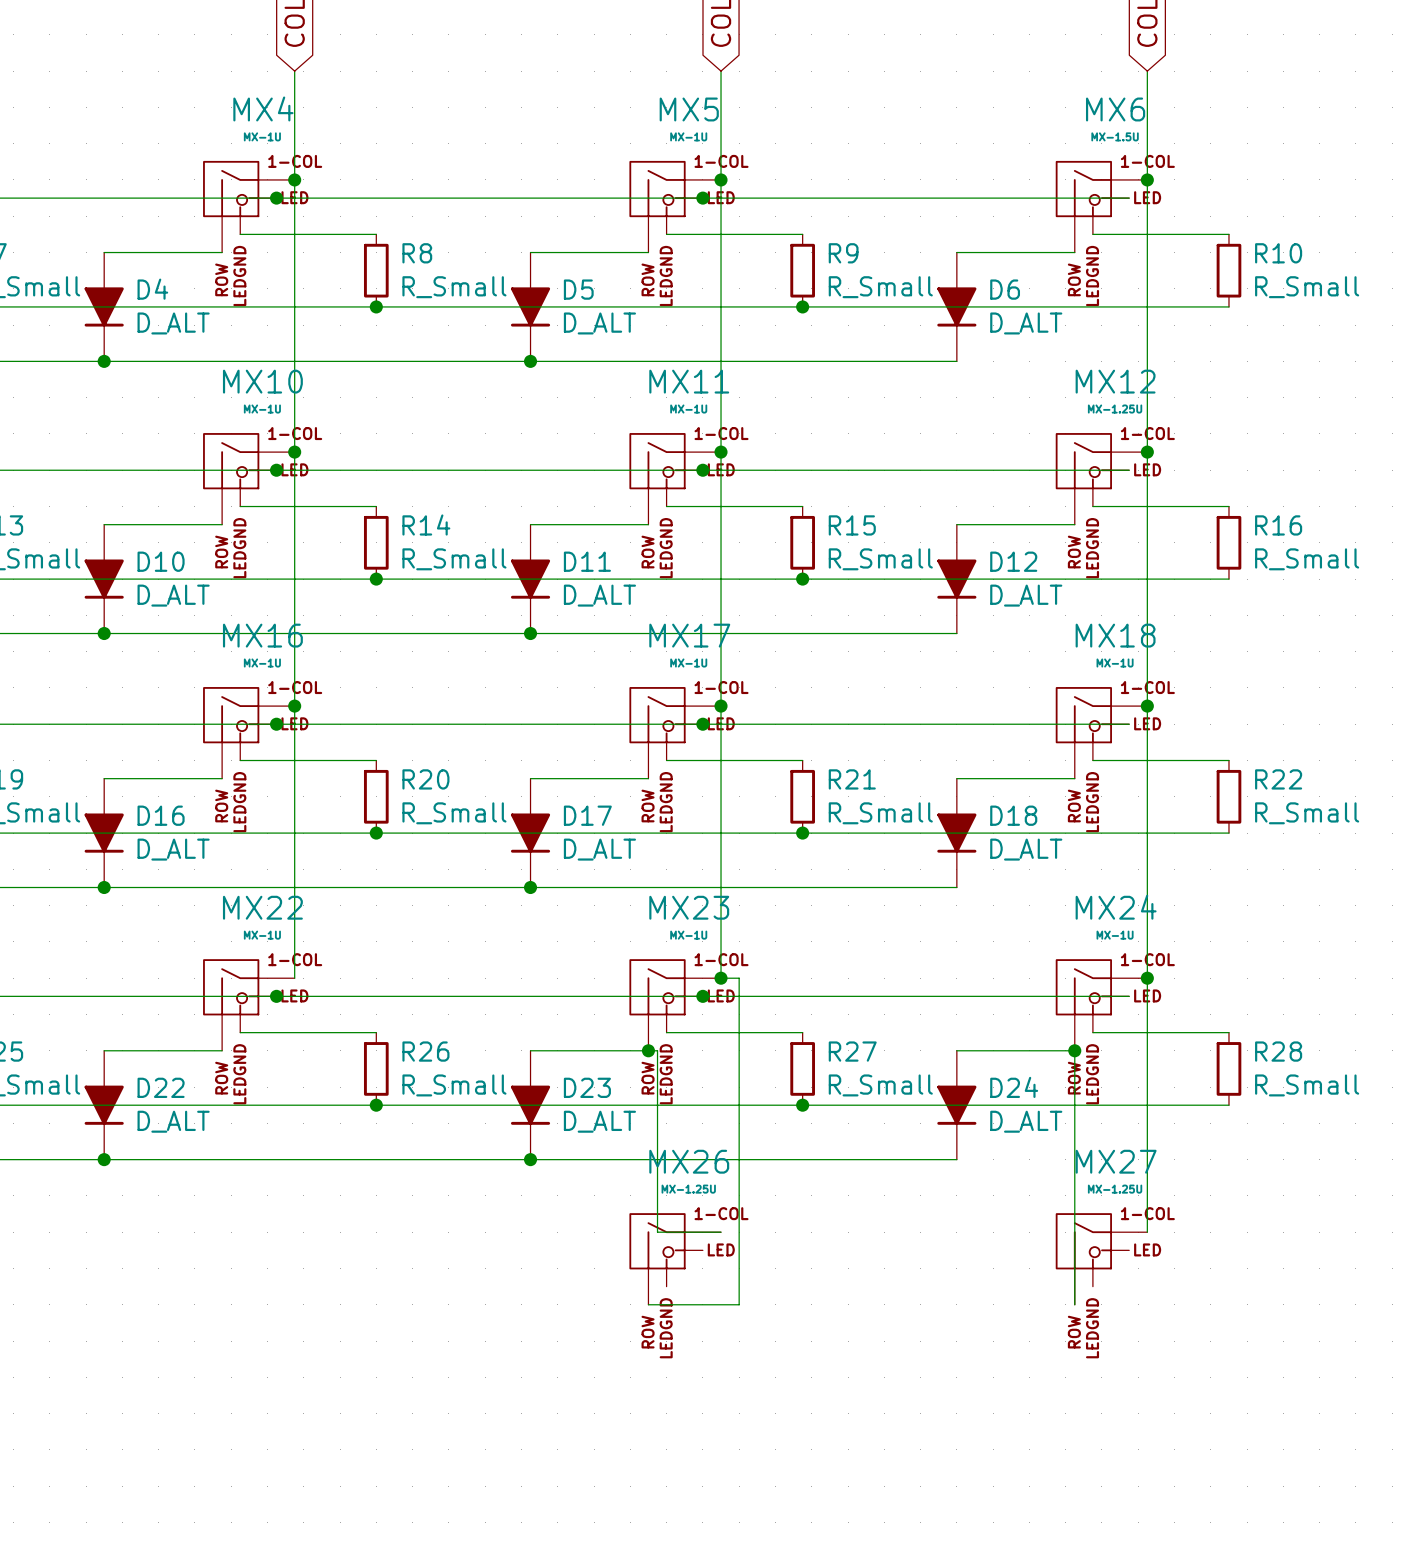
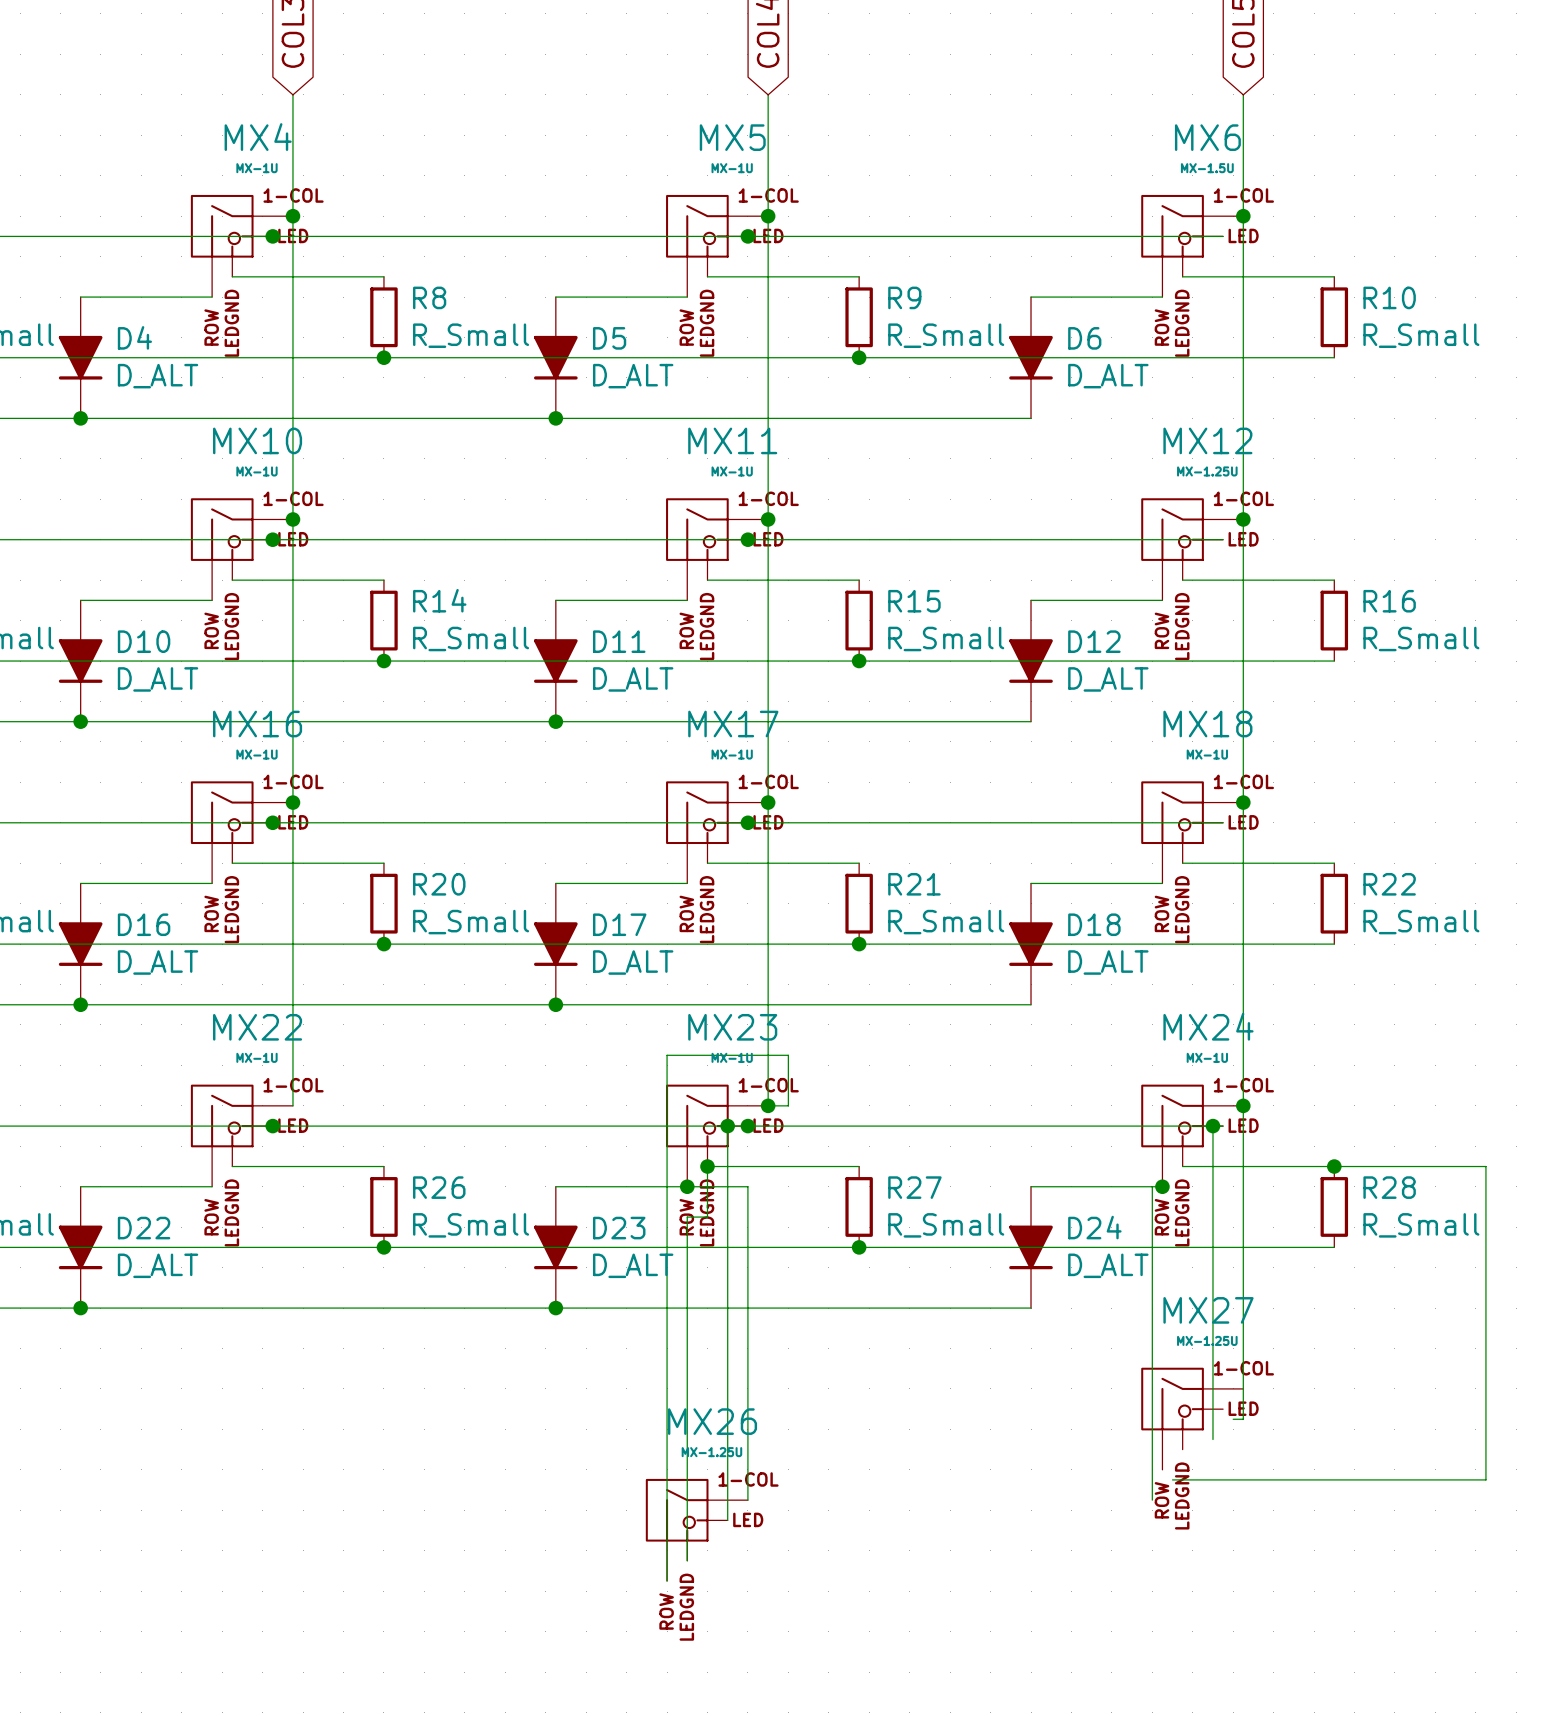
wire: (739, 978) (739, 1304) (648, 1304) -> (788, 1105) (788, 1055) (667, 1055) (667, 1581)
wire: none -> (727, 1126) (727, 1520)
junction: none -> (727, 1126)
wire: none -> (1212, 1126) (1212, 1439)
junction: none -> (1212, 1126)
wire: none -> (707, 1166) (707, 1217) (687, 1217) (687, 1560)
junction: none -> (707, 1166)
wire: none -> (1334, 1166) (1485, 1166) (1485, 1479) (1172, 1479)
junction: none -> (1334, 1166)
wire: (657, 1050) (657, 1232) (721, 1232) -> (697, 1186) (747, 1186) (747, 1500)
wire: none -> (1152, 1186) (1152, 1500)
wire: (1074, 1050) (1074, 1304) -> none
wire: none -> (1243, 1388) (1243, 1419) (1233, 1419)
MX26 position: (675, 1258) -> (696, 1529)

